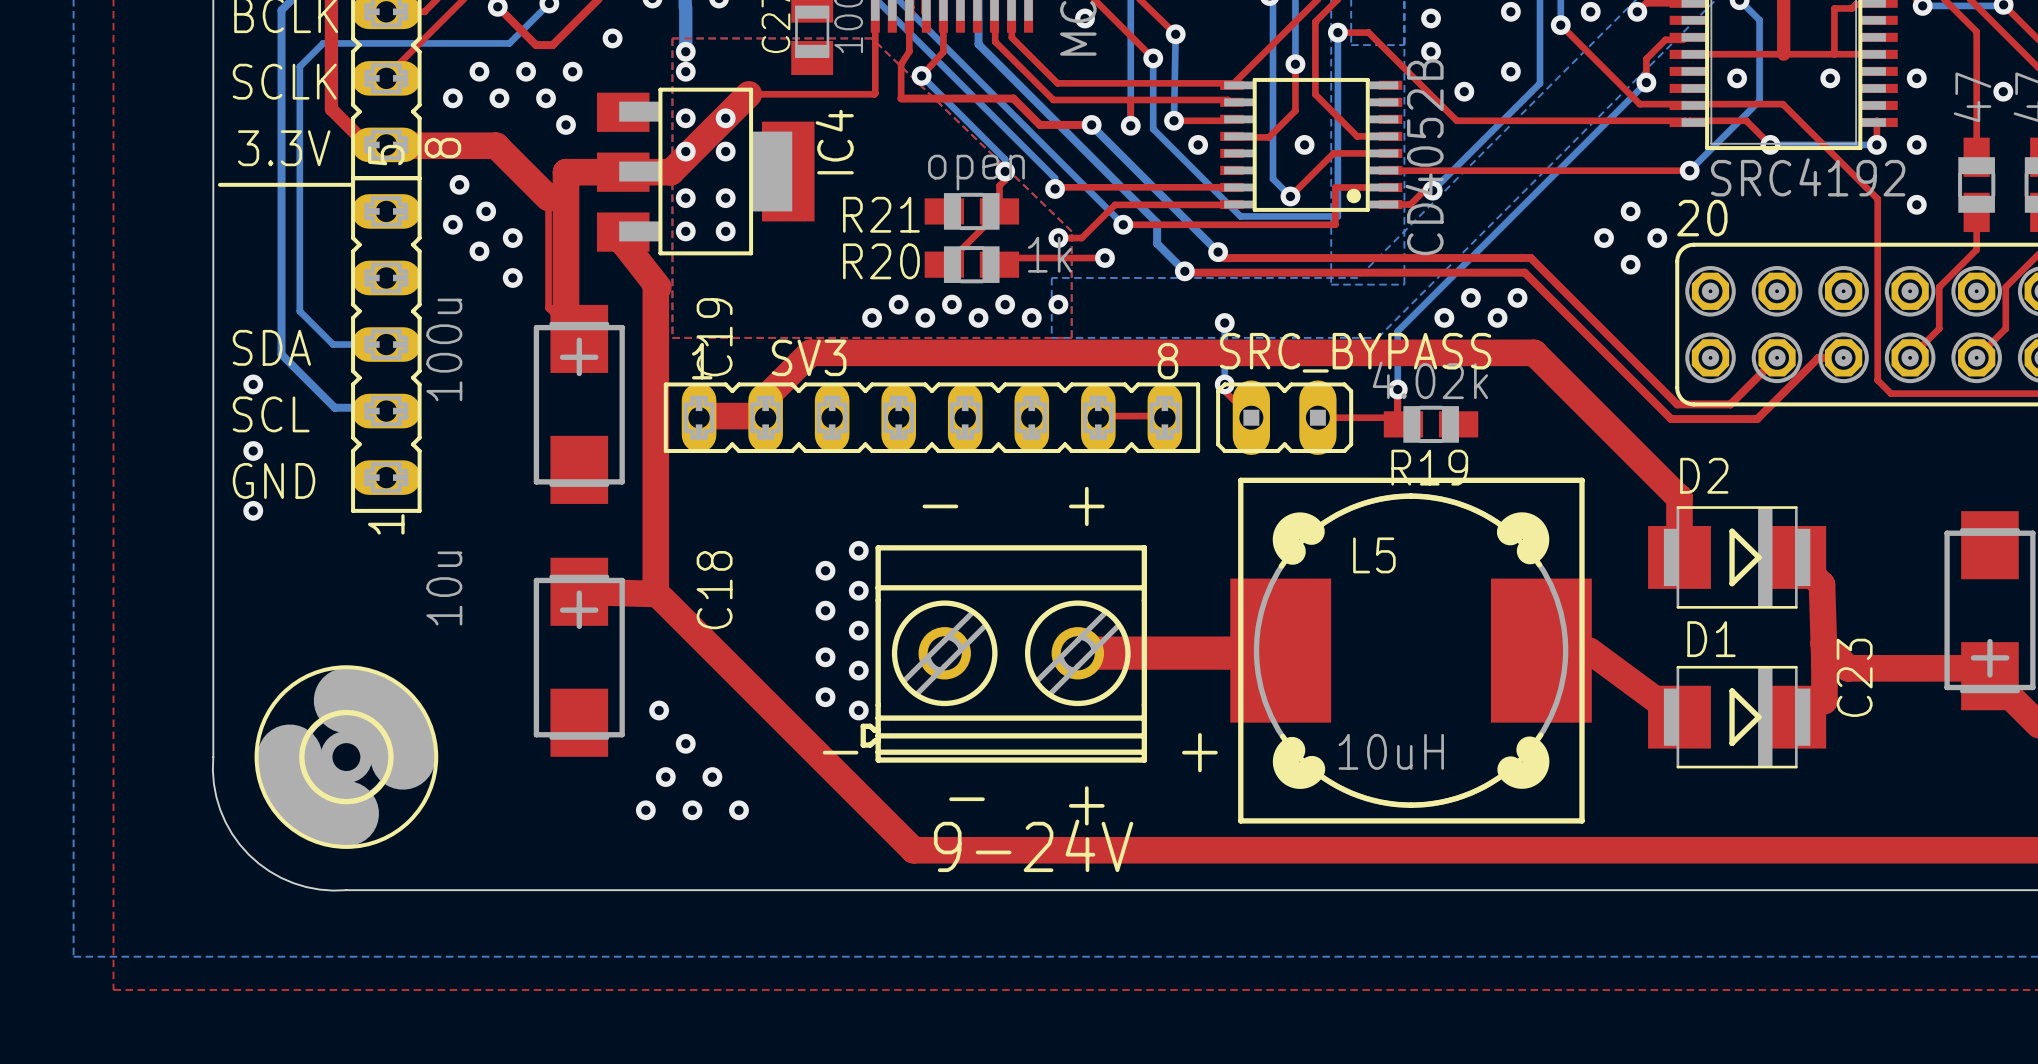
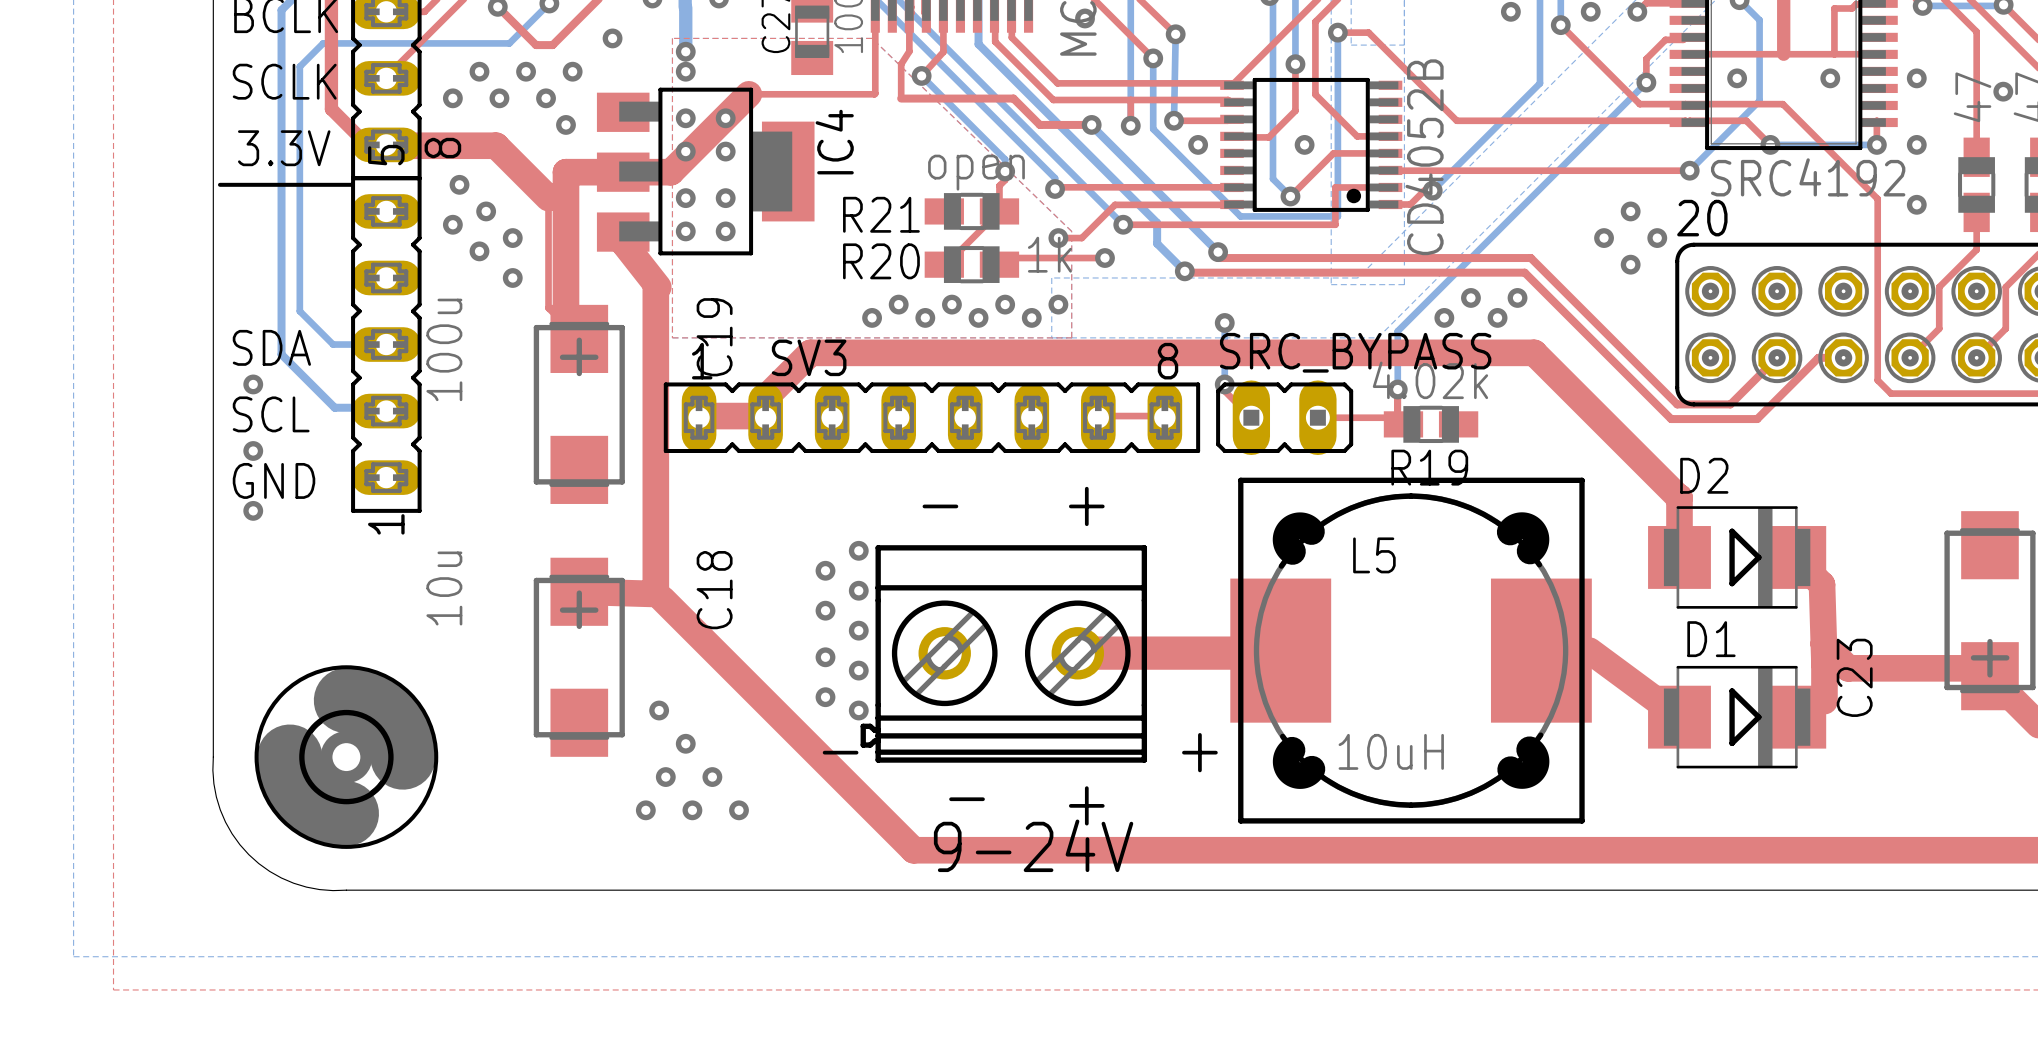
via: (1431, 18) -> none
via: (1431, 51) -> none
via: (1510, 71) -> none
via: (1464, 91) -> none

